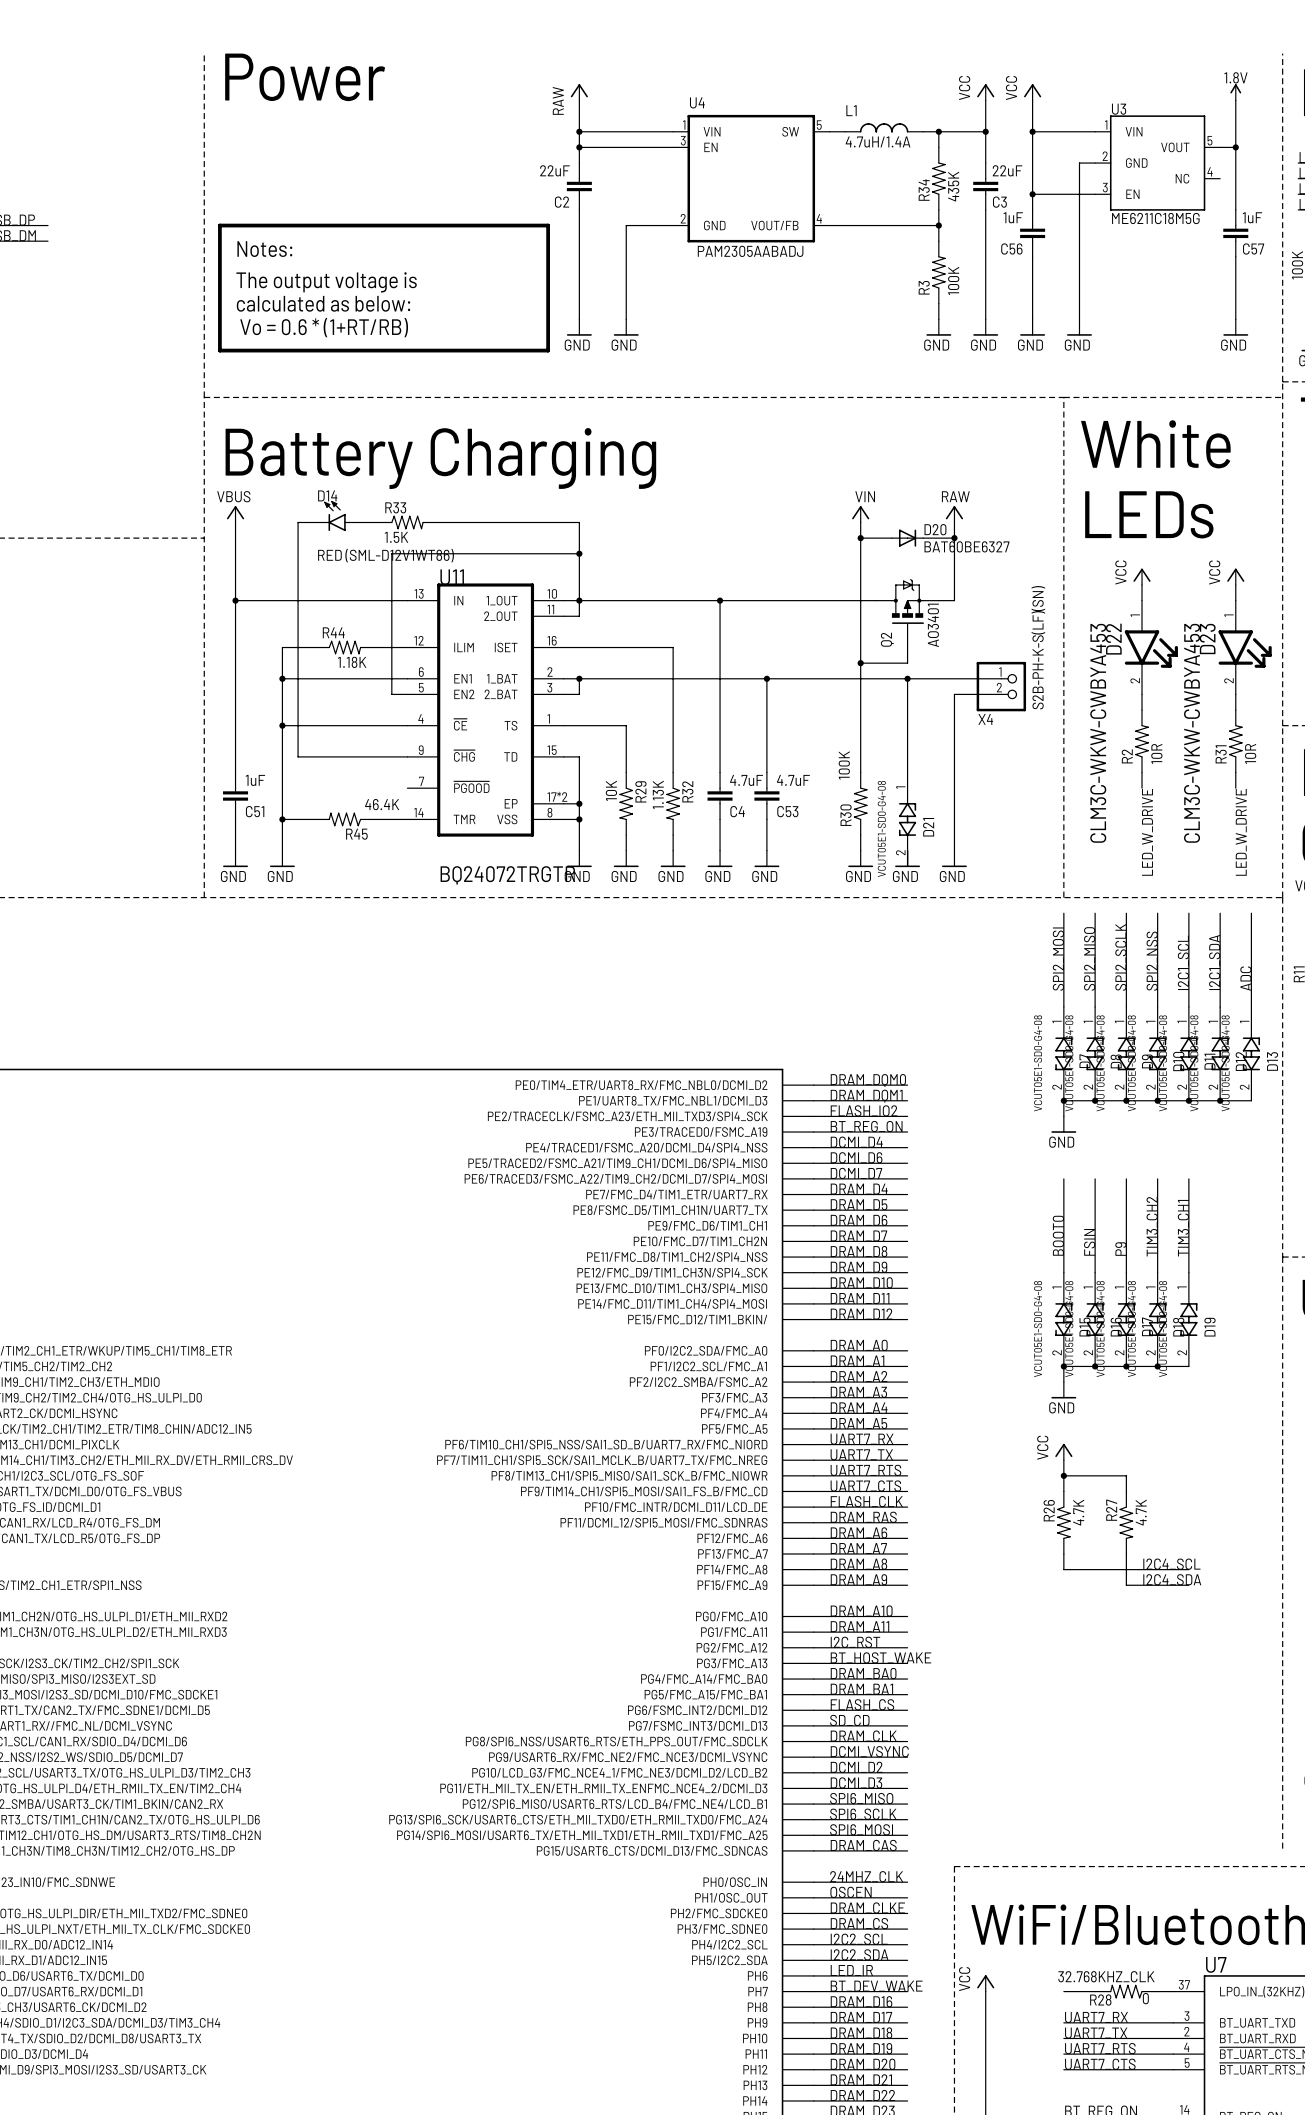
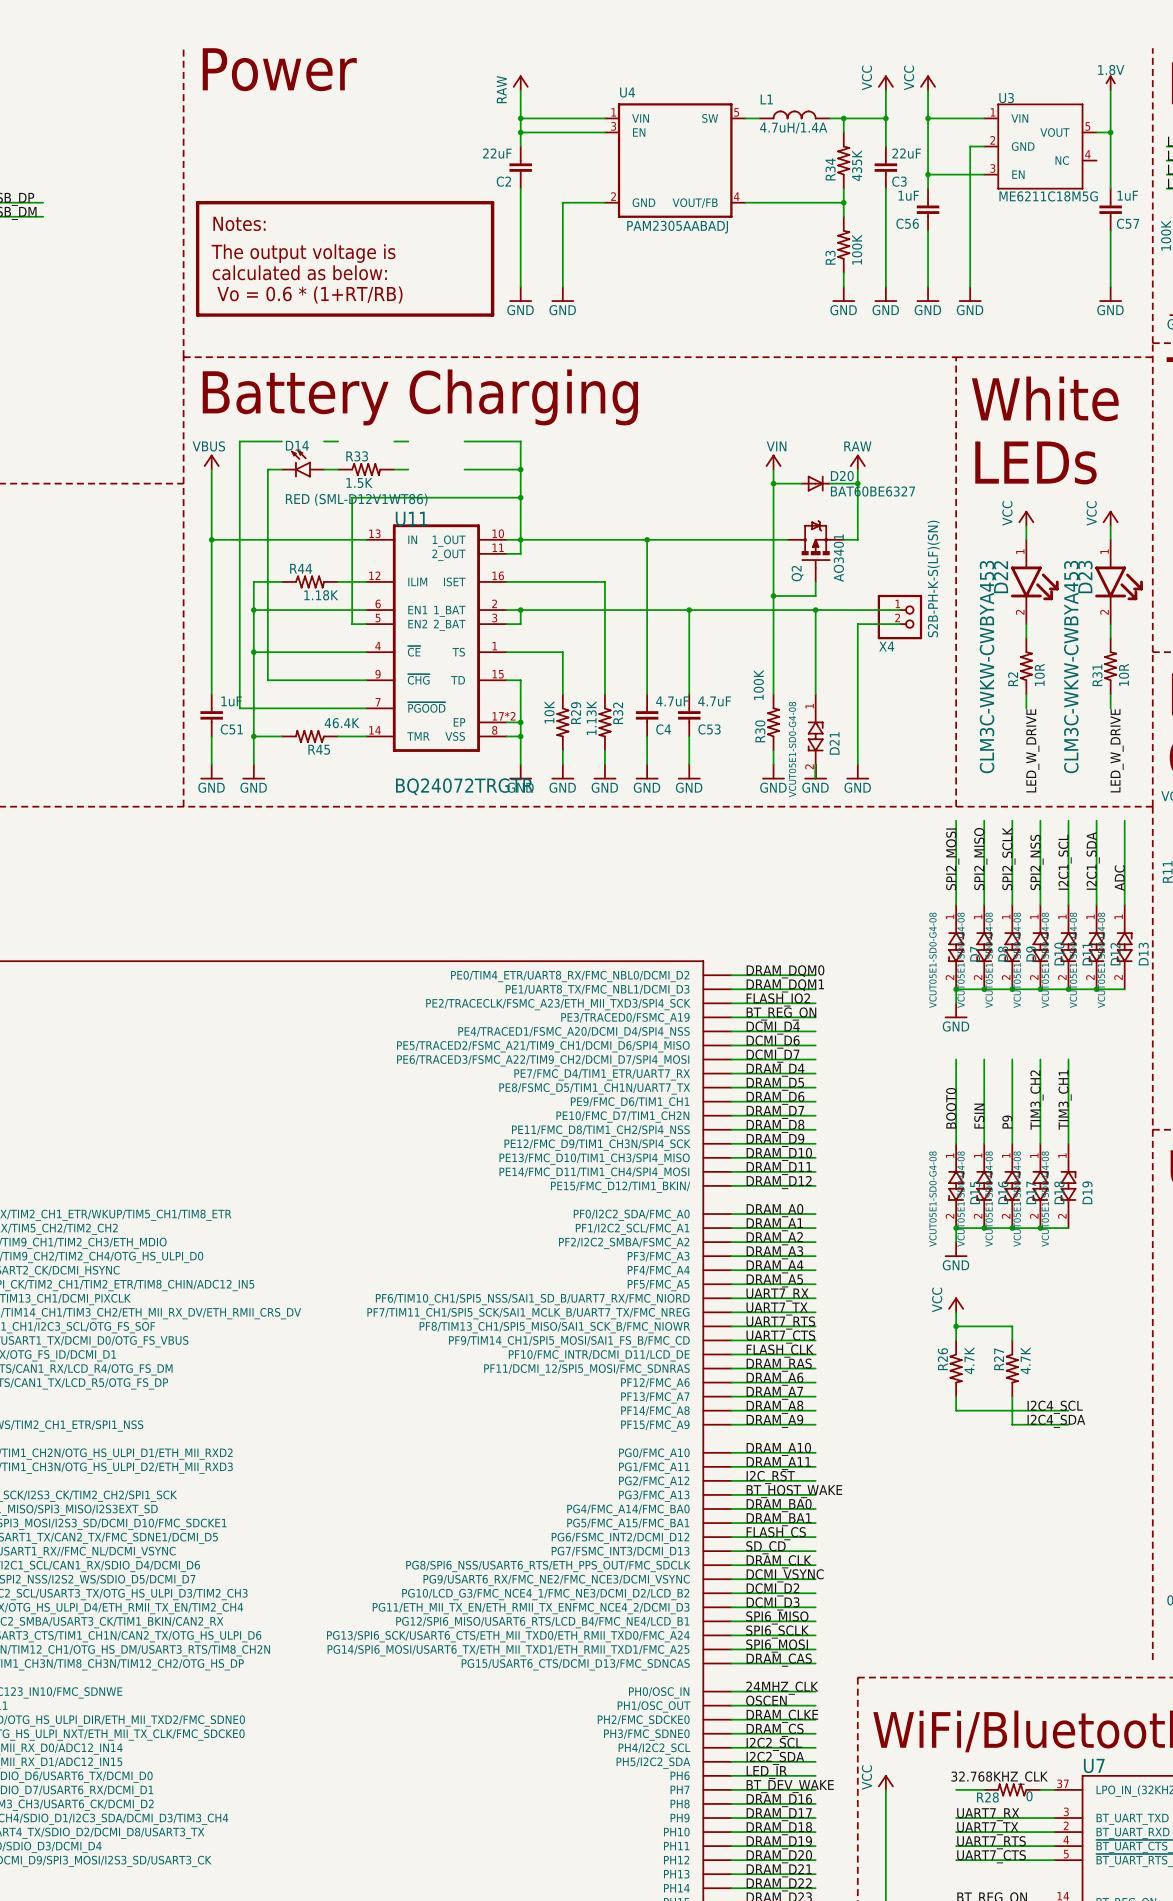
text position: Battery Charging (440, 458) -> Battery Charging (420, 397)
wire: none -> (281, 441) (239, 441) (239, 708) (366, 708)
wire: none -> (324, 441) (338, 441)
wire: none -> (394, 441) (408, 441)
wire: none -> (464, 441) (520, 441) (520, 469)
wire: (454, 522) (516, 522) -> none
junction: none -> (520, 469)

